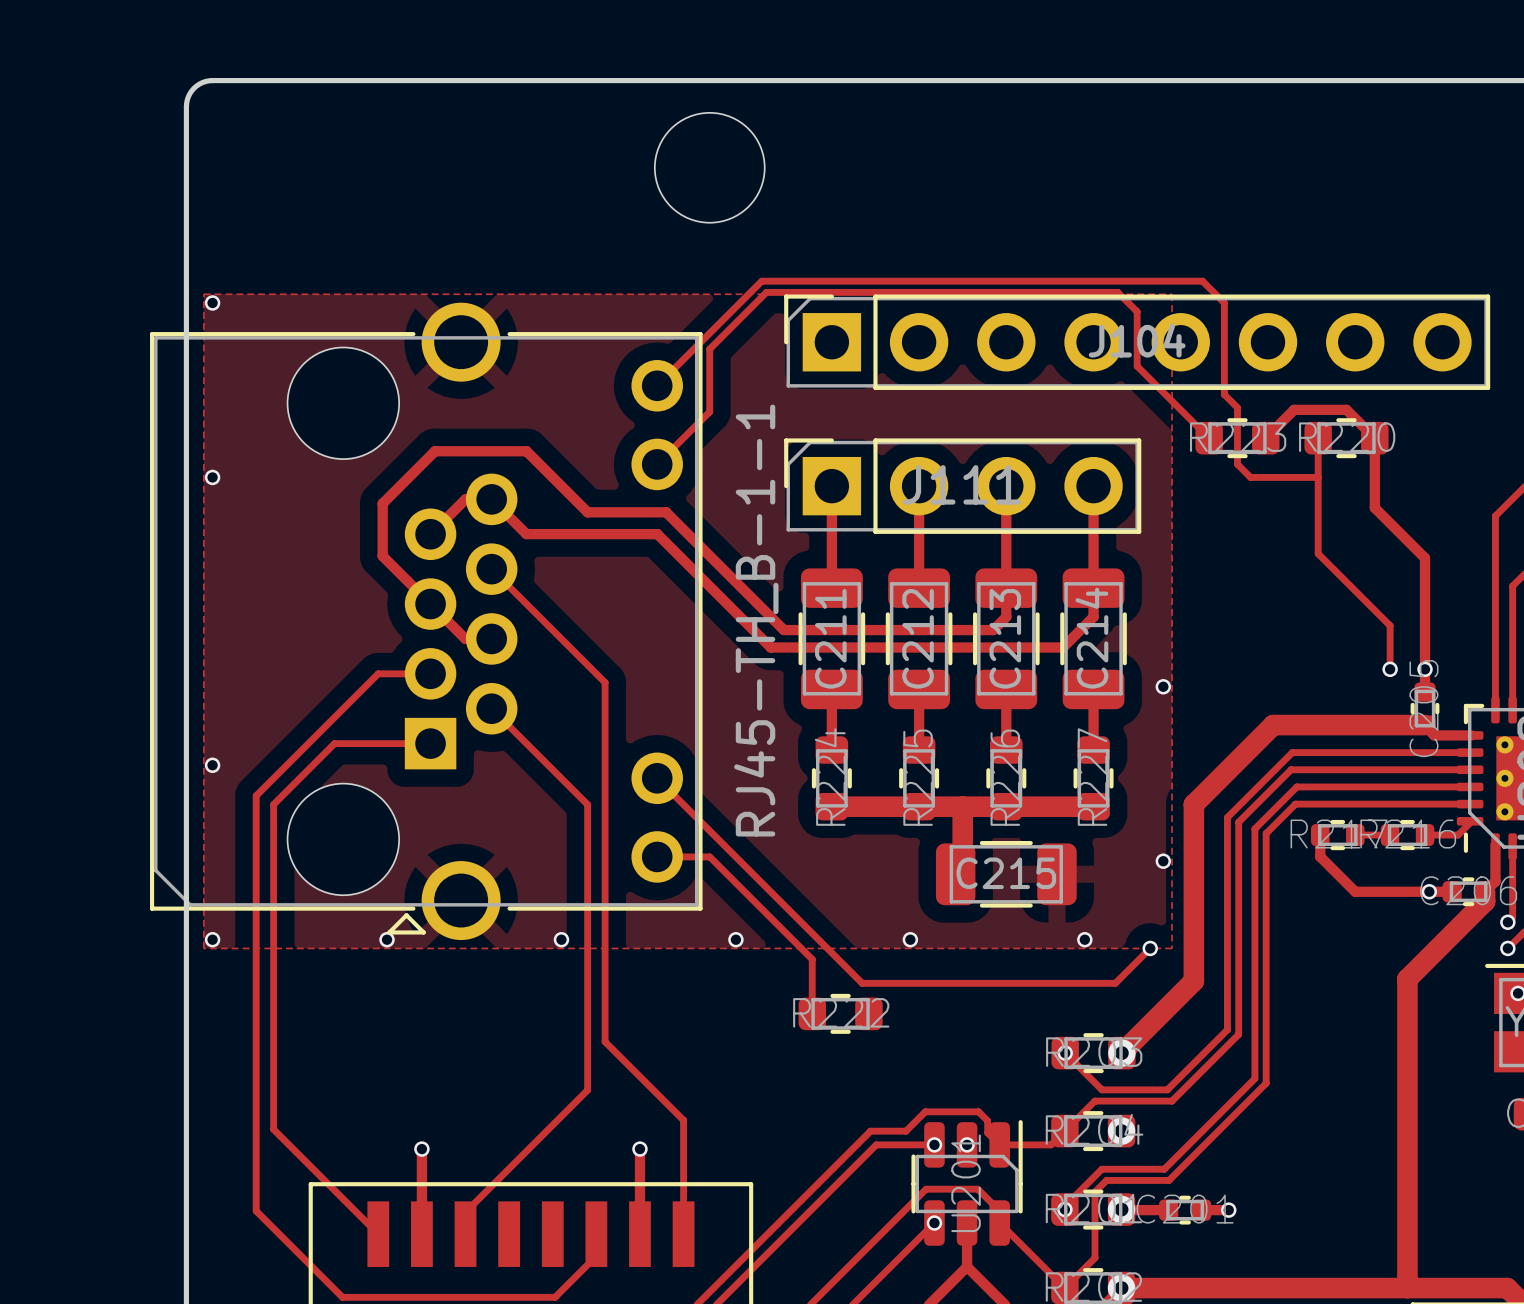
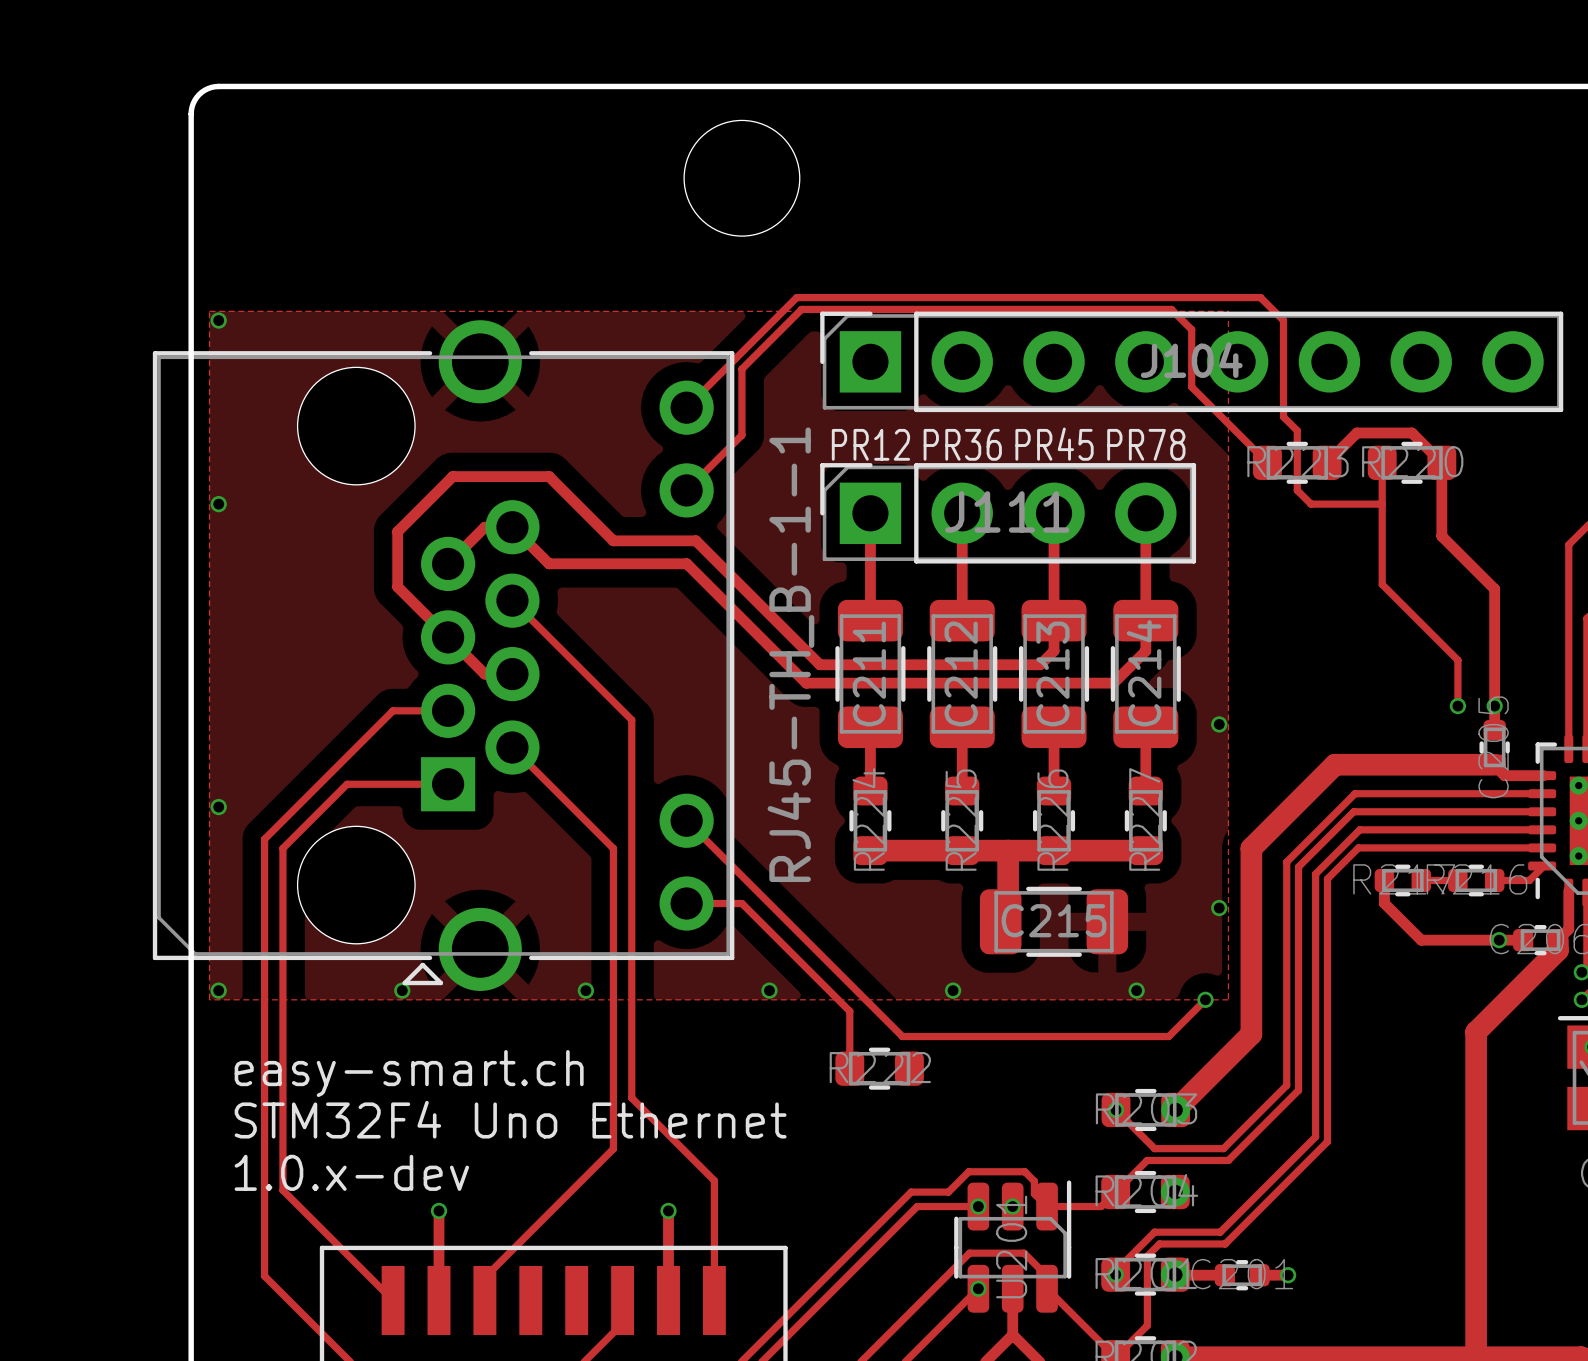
text: none -> PR45 (1054, 444)
text: none -> PR12 (870, 444)
text: none -> PR36 (962, 444)
text: none -> PR78 (1146, 444)
text: none -> easy-smart.ch (409, 1073)
text: none -> STM32F4 Uno Ethernet (510, 1119)
text: none -> 1.0.x-dev (351, 1172)

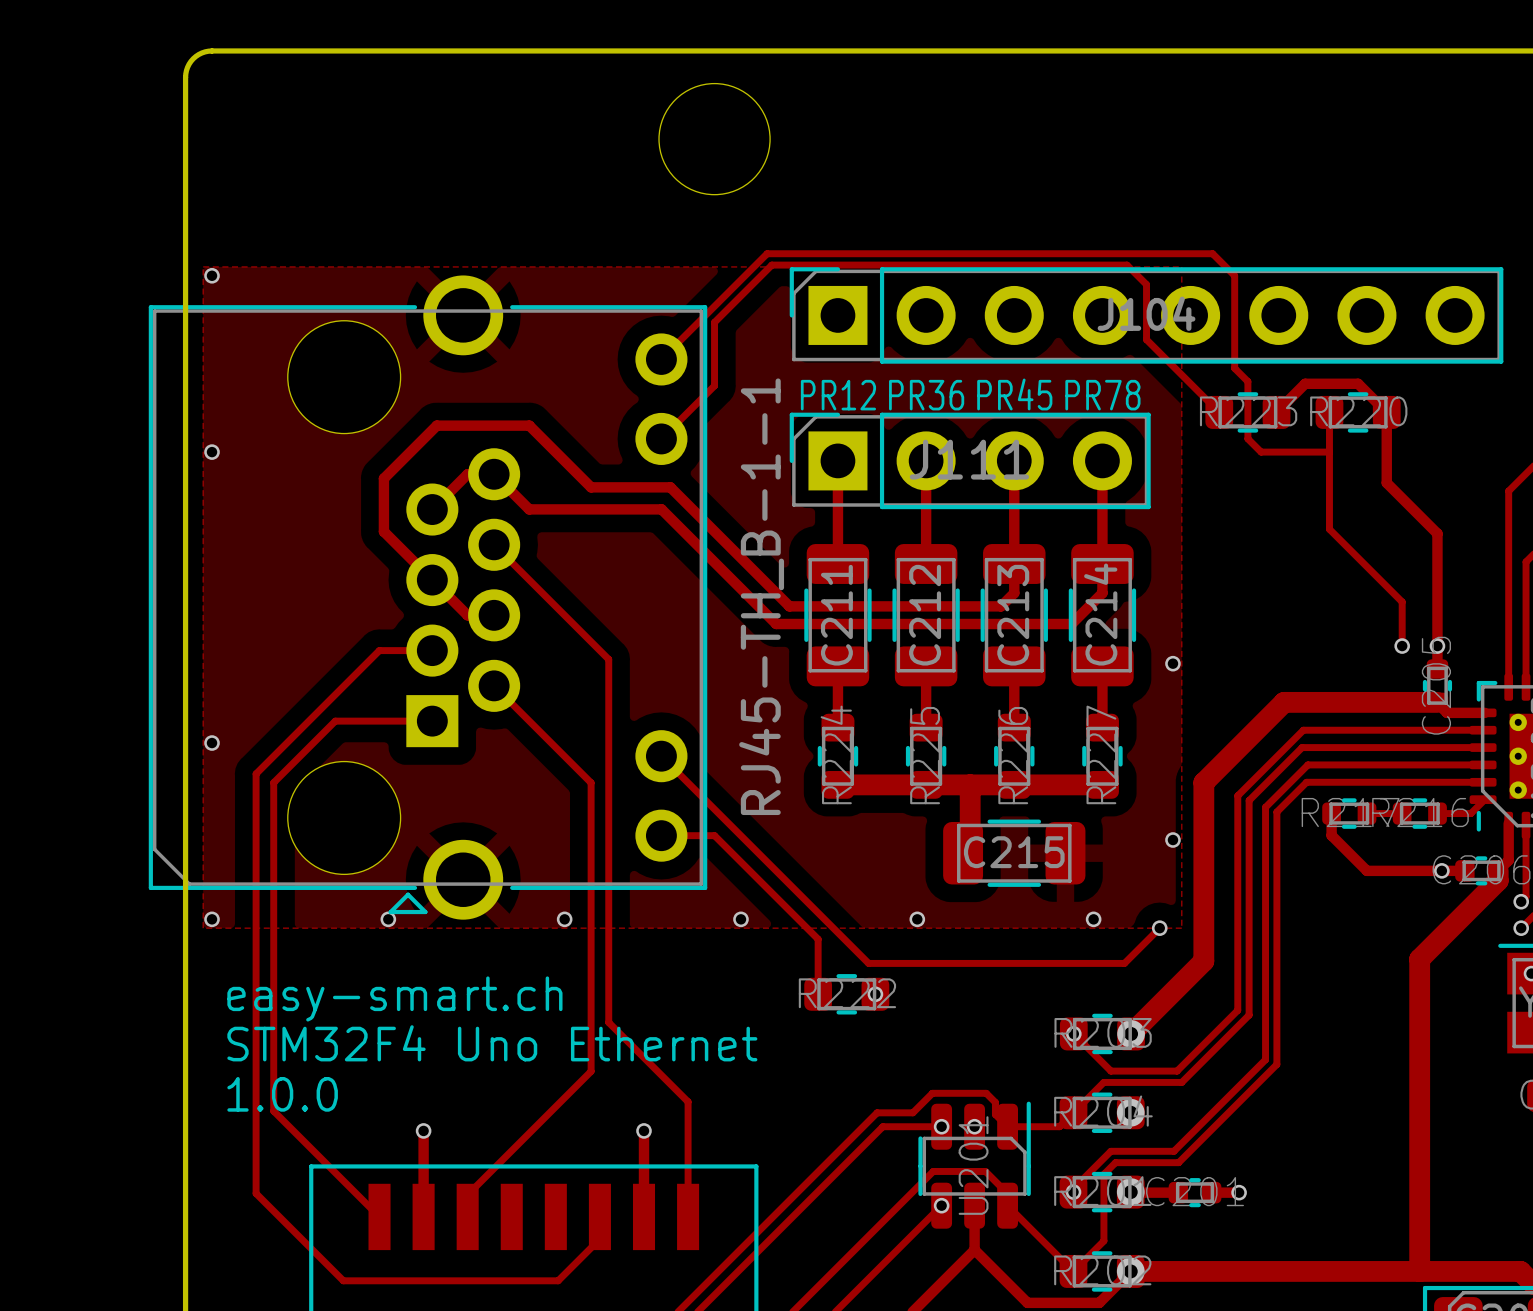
via: none -> (875, 994)
text: 1.0.x-dev (351, 1172) -> 1.0.0 (282, 1094)

